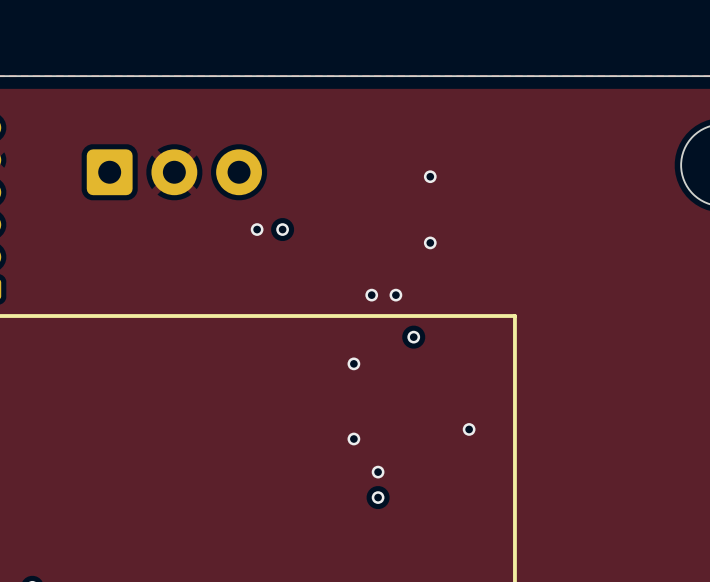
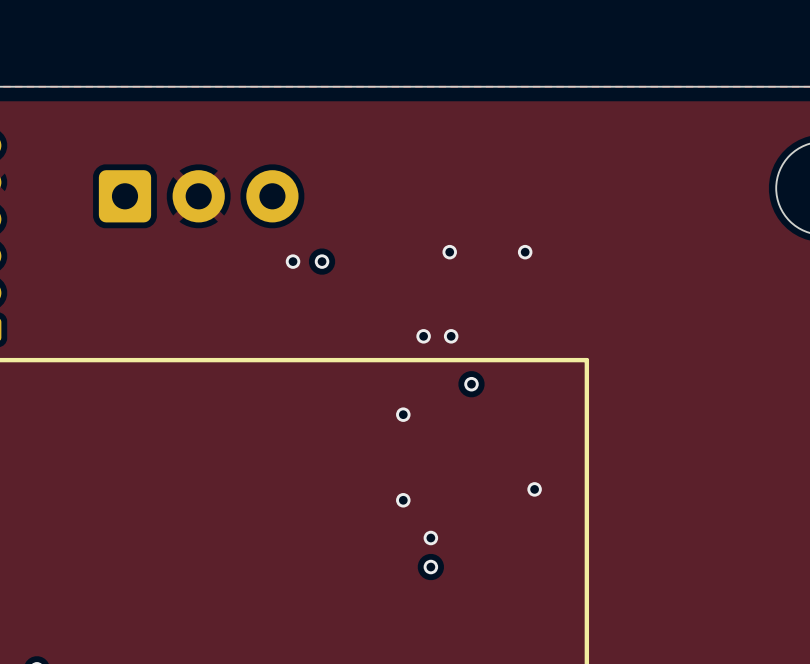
via: (430, 176) -> none
via: none -> (449, 252)
via: none -> (525, 252)
via: (430, 242) -> none

